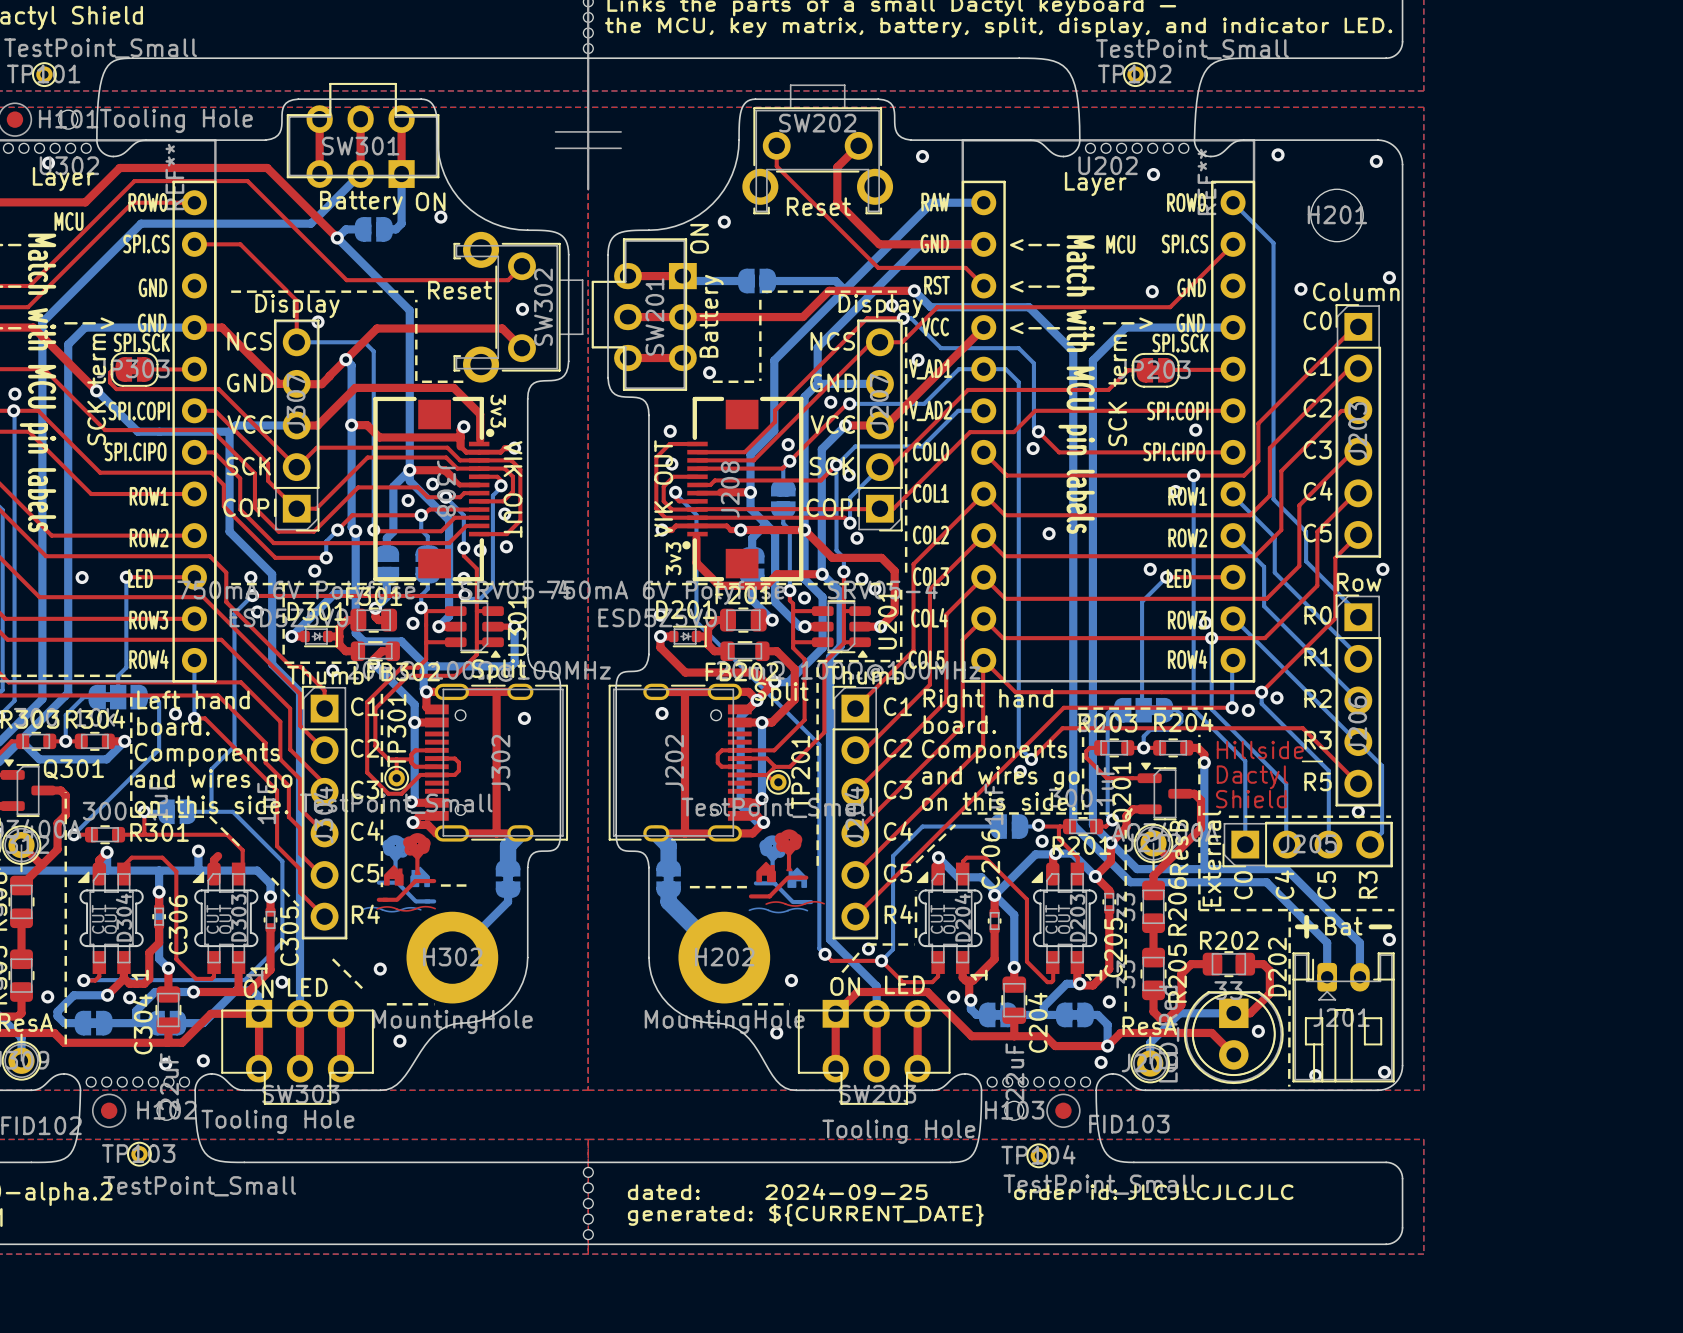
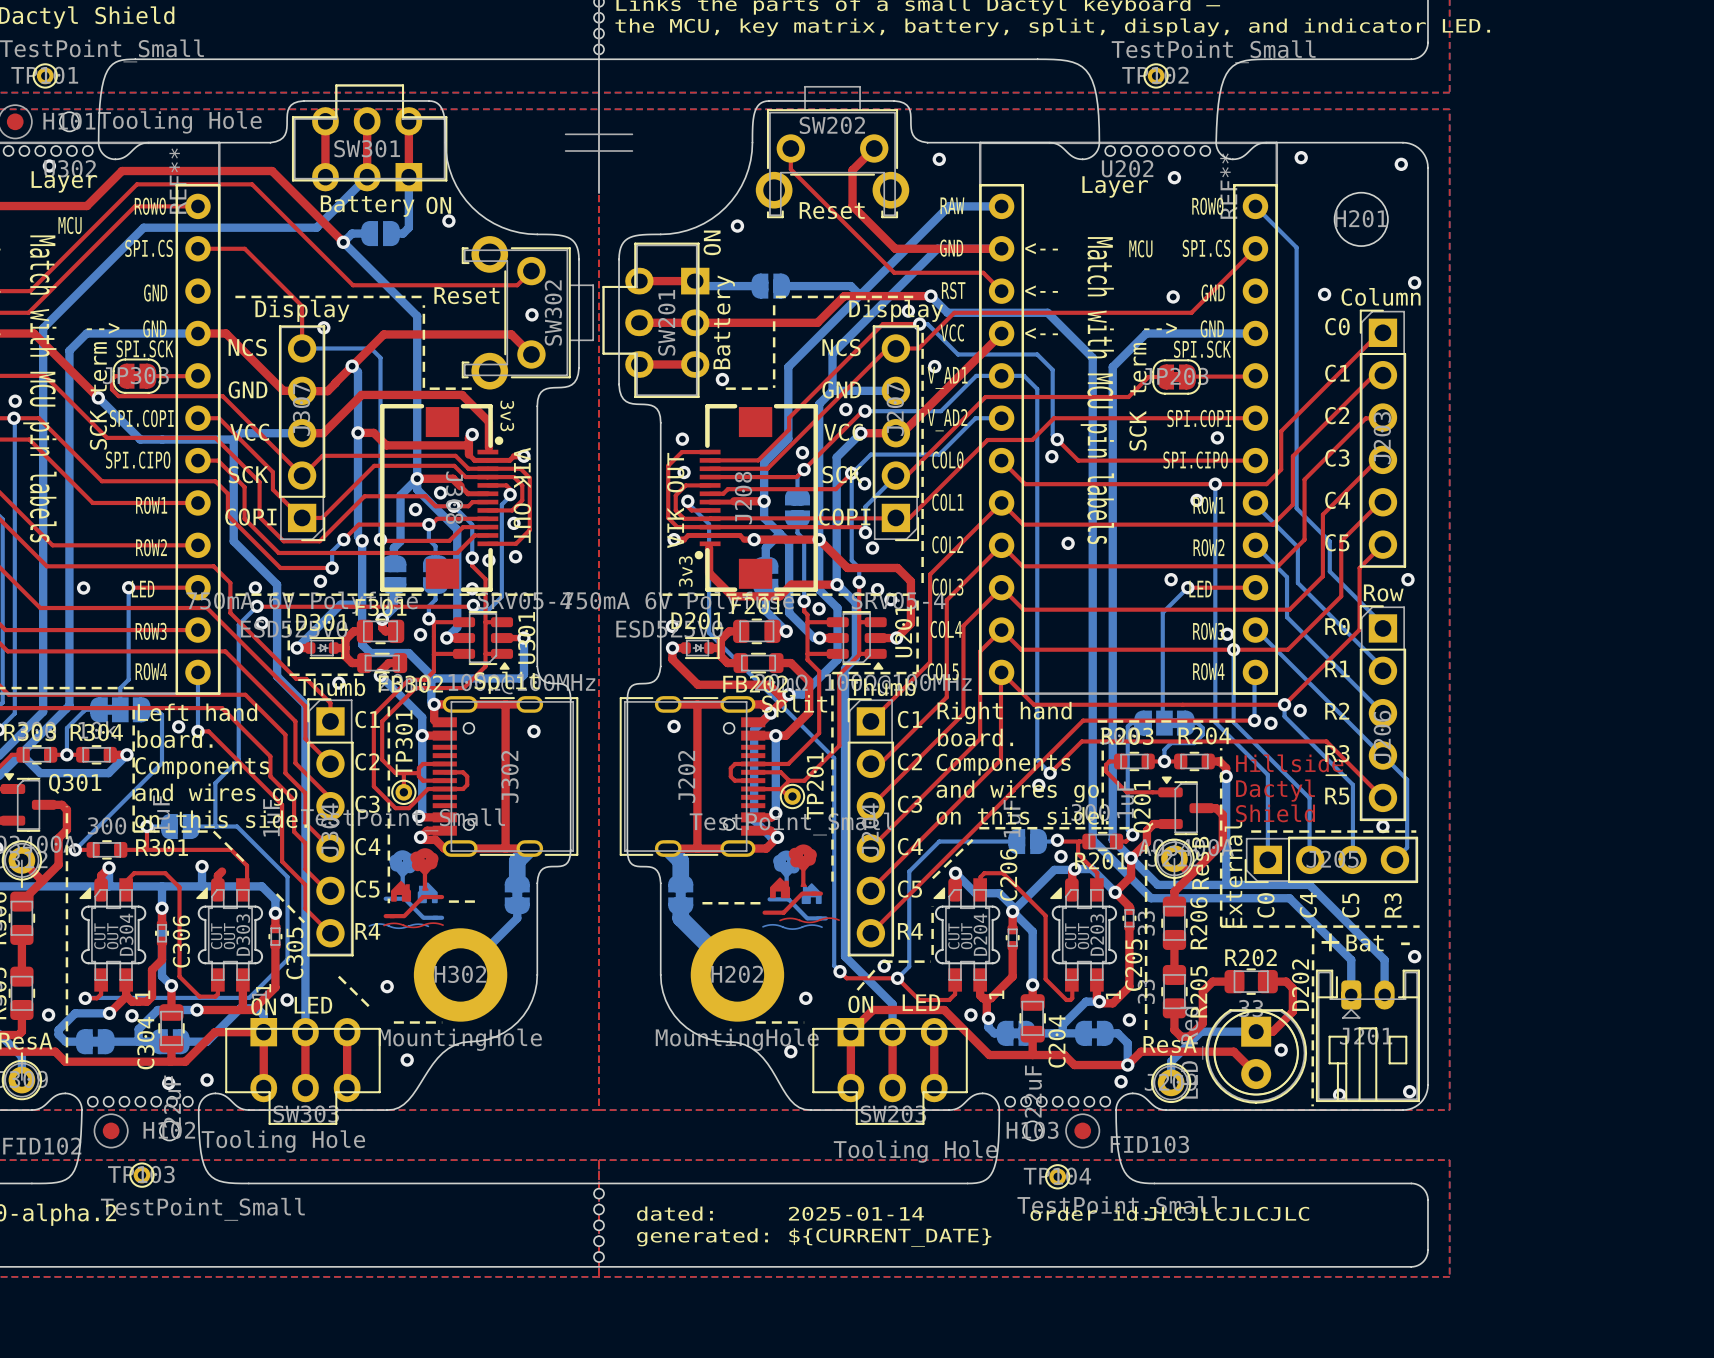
text: dated: 2024-09-25 (777, 1191) -> dated: 2025-01-14 (780, 1213)

